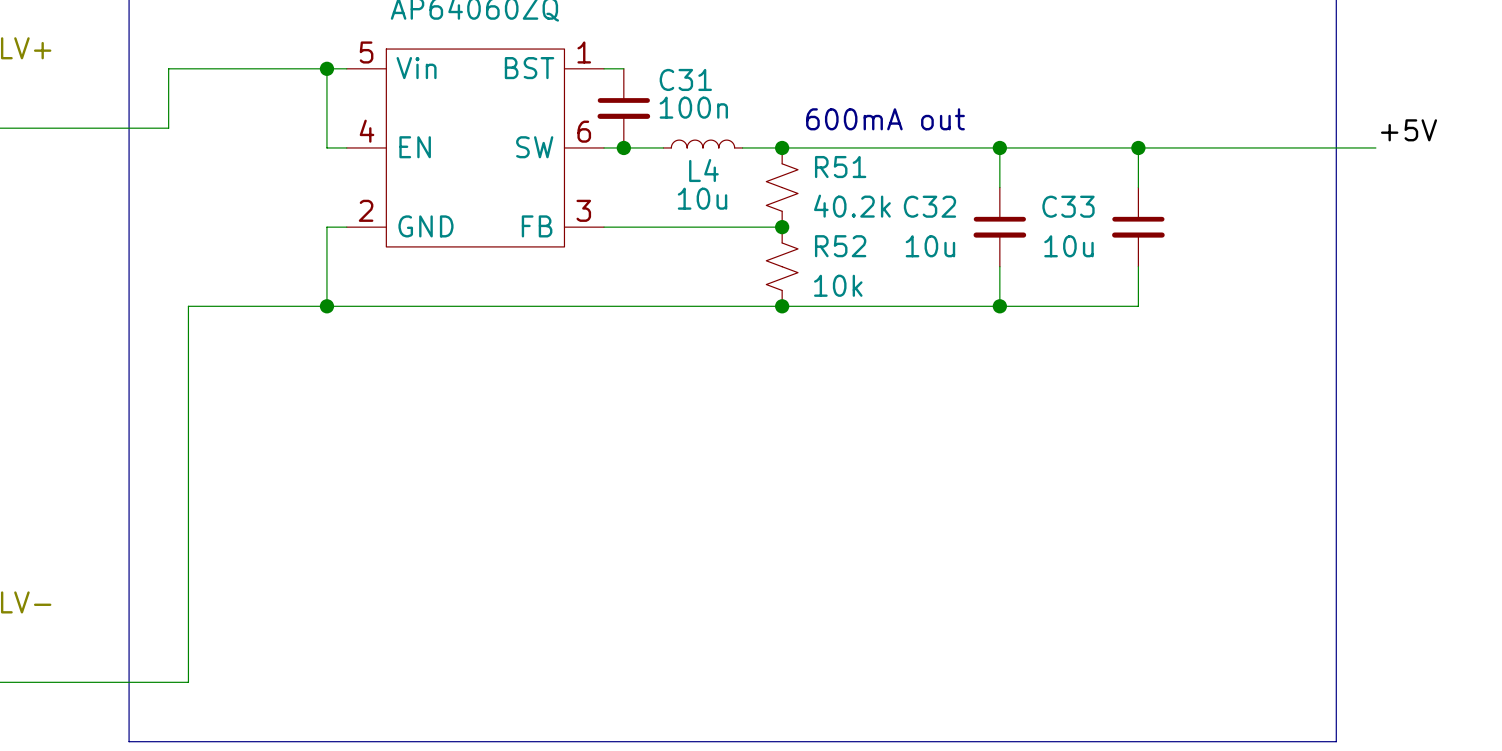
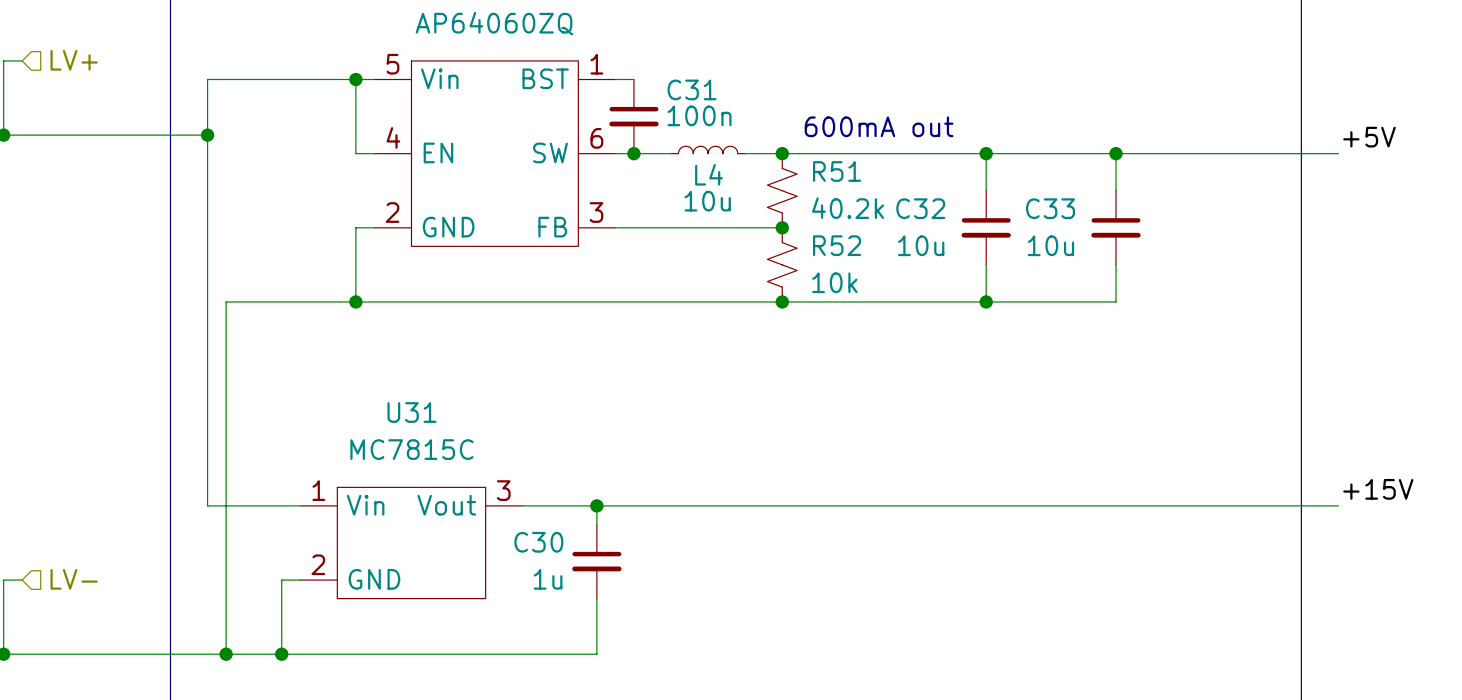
wire: none -> (207, 135) (207, 505) (300, 505)
junction: none -> (207, 135)
label: none -> +15V (1378, 489)
wire: none -> (522, 505) (1338, 505)
wire: none -> (596, 505) (596, 524)
junction: none -> (596, 505)
U31: none -> MC7815C (411, 542)
C30: none -> 1u (596, 561)
wire: none -> (300, 580) (281, 580) (281, 654)
wire: none -> (596, 598) (596, 654) (226, 654)
junction: none -> (226, 654)
junction: none -> (281, 654)

